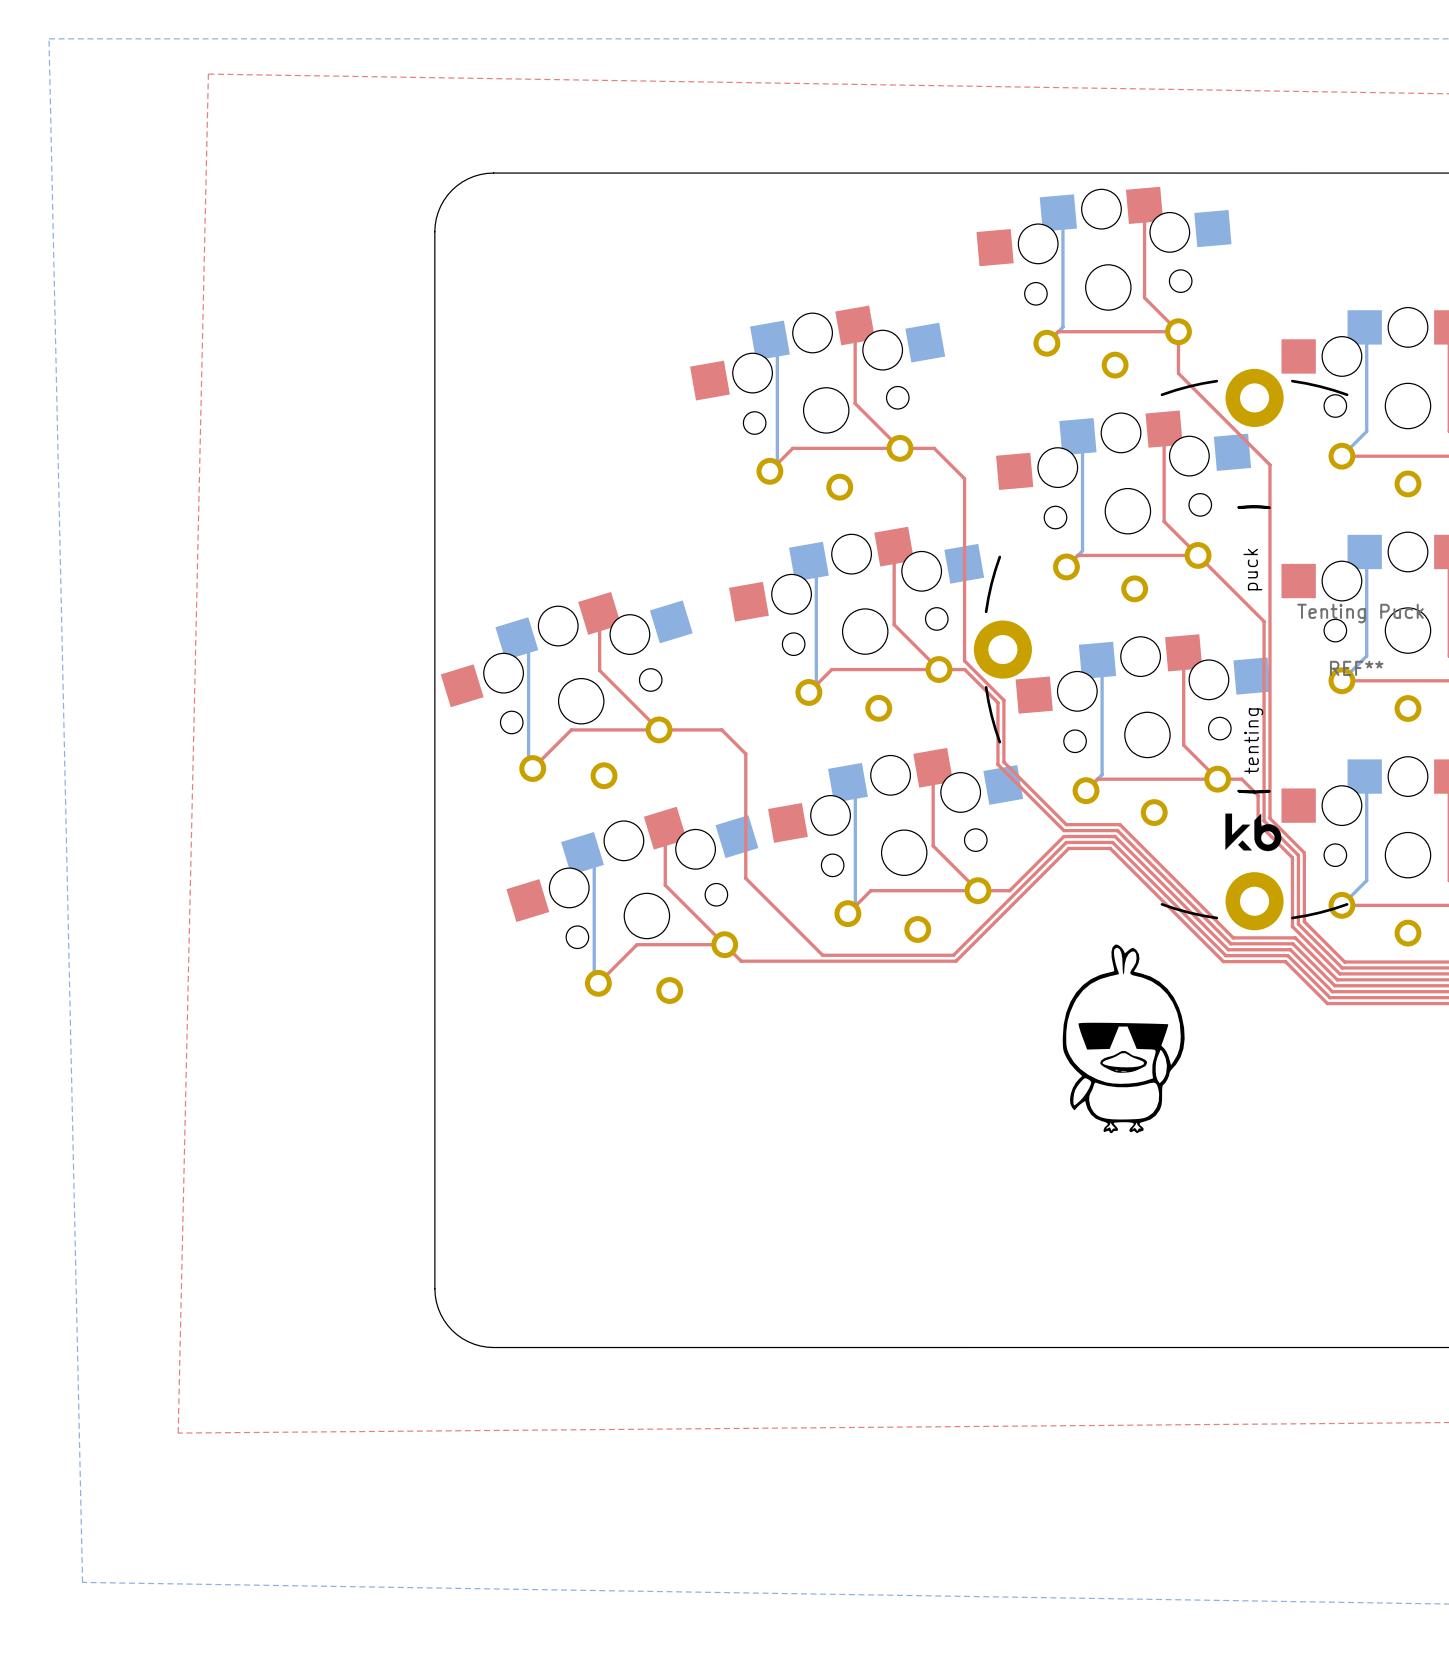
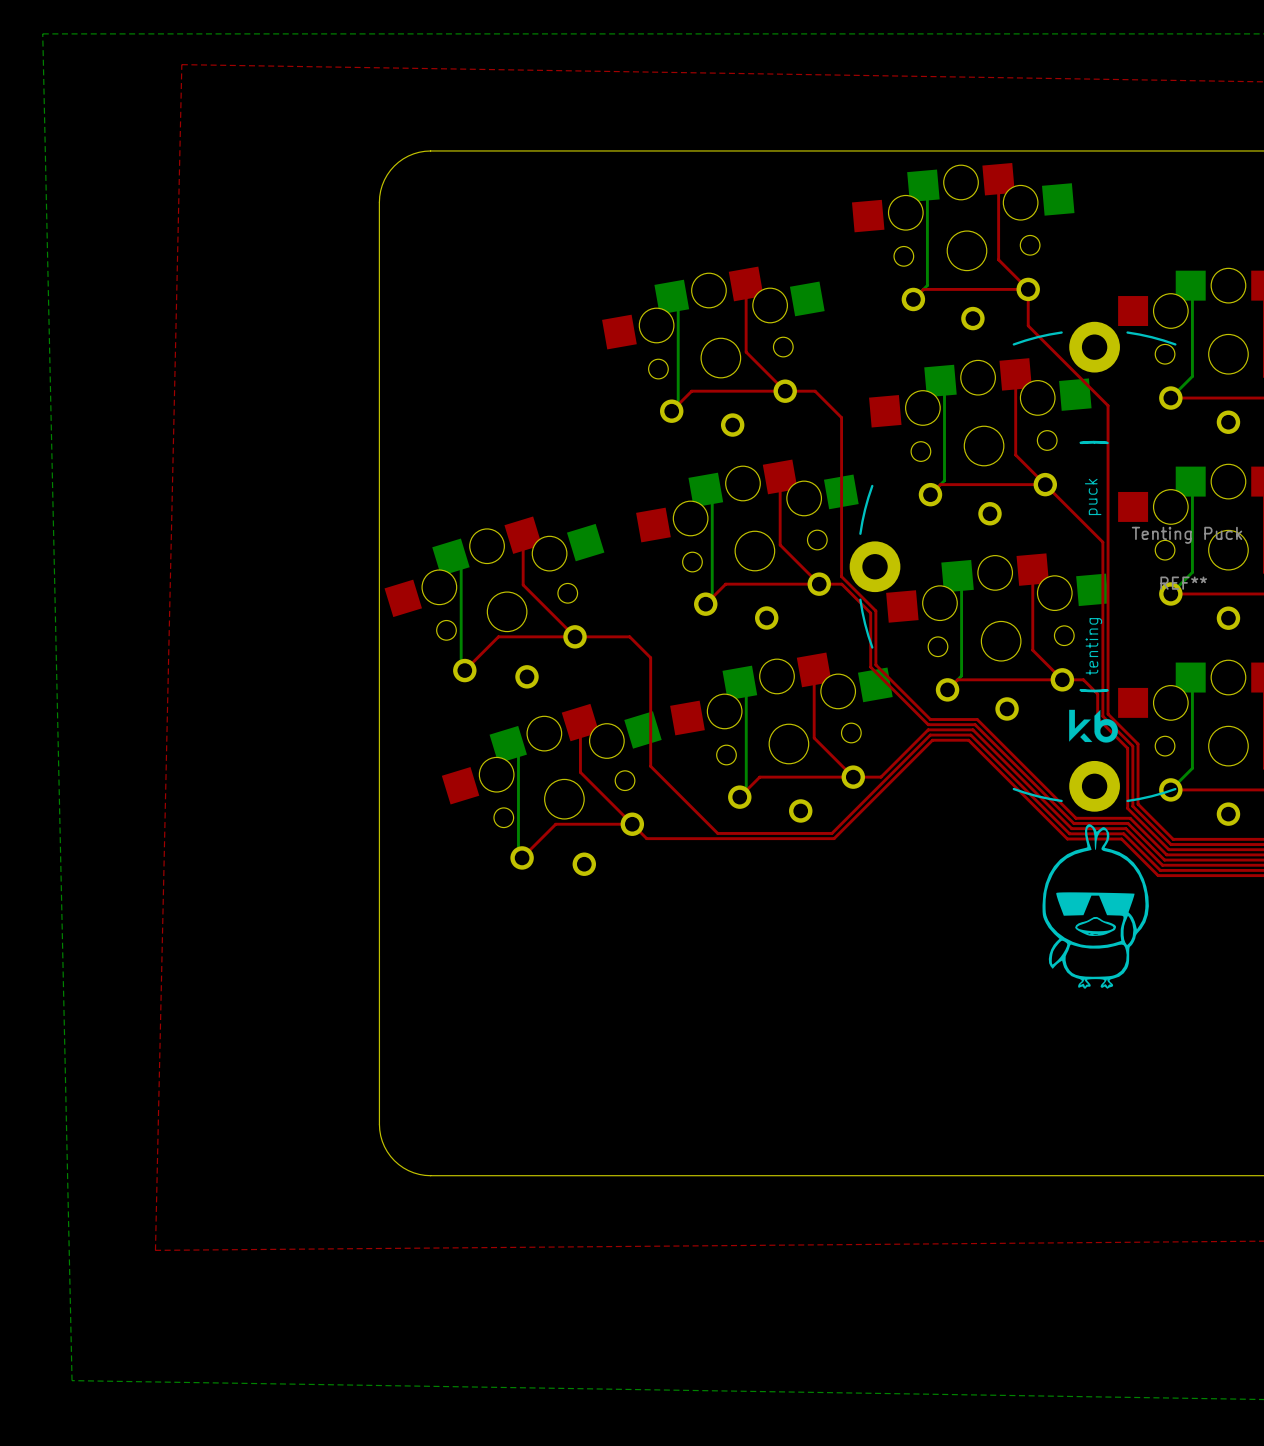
drawing position: (1123, 1038) -> (1095, 906)

